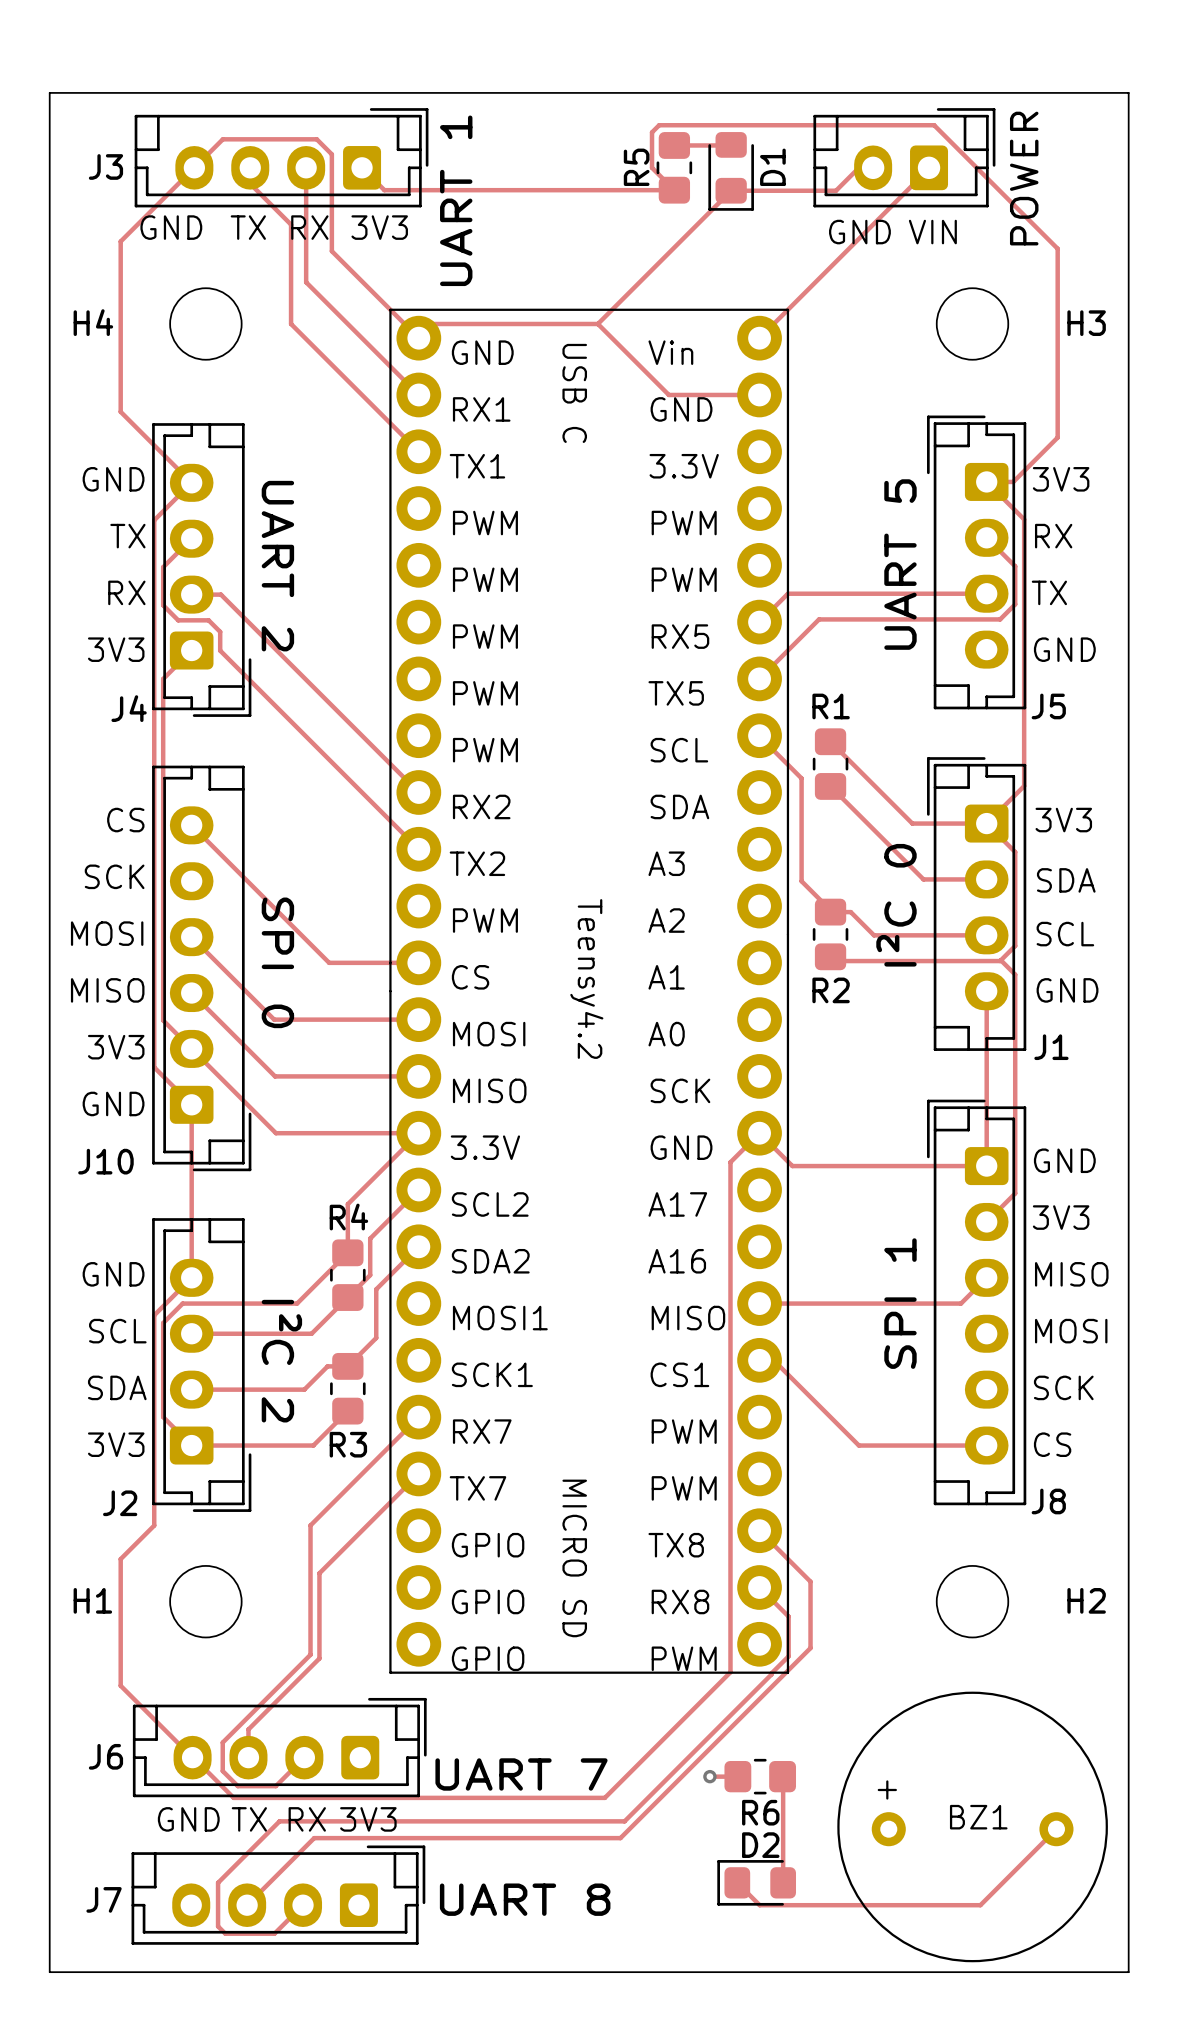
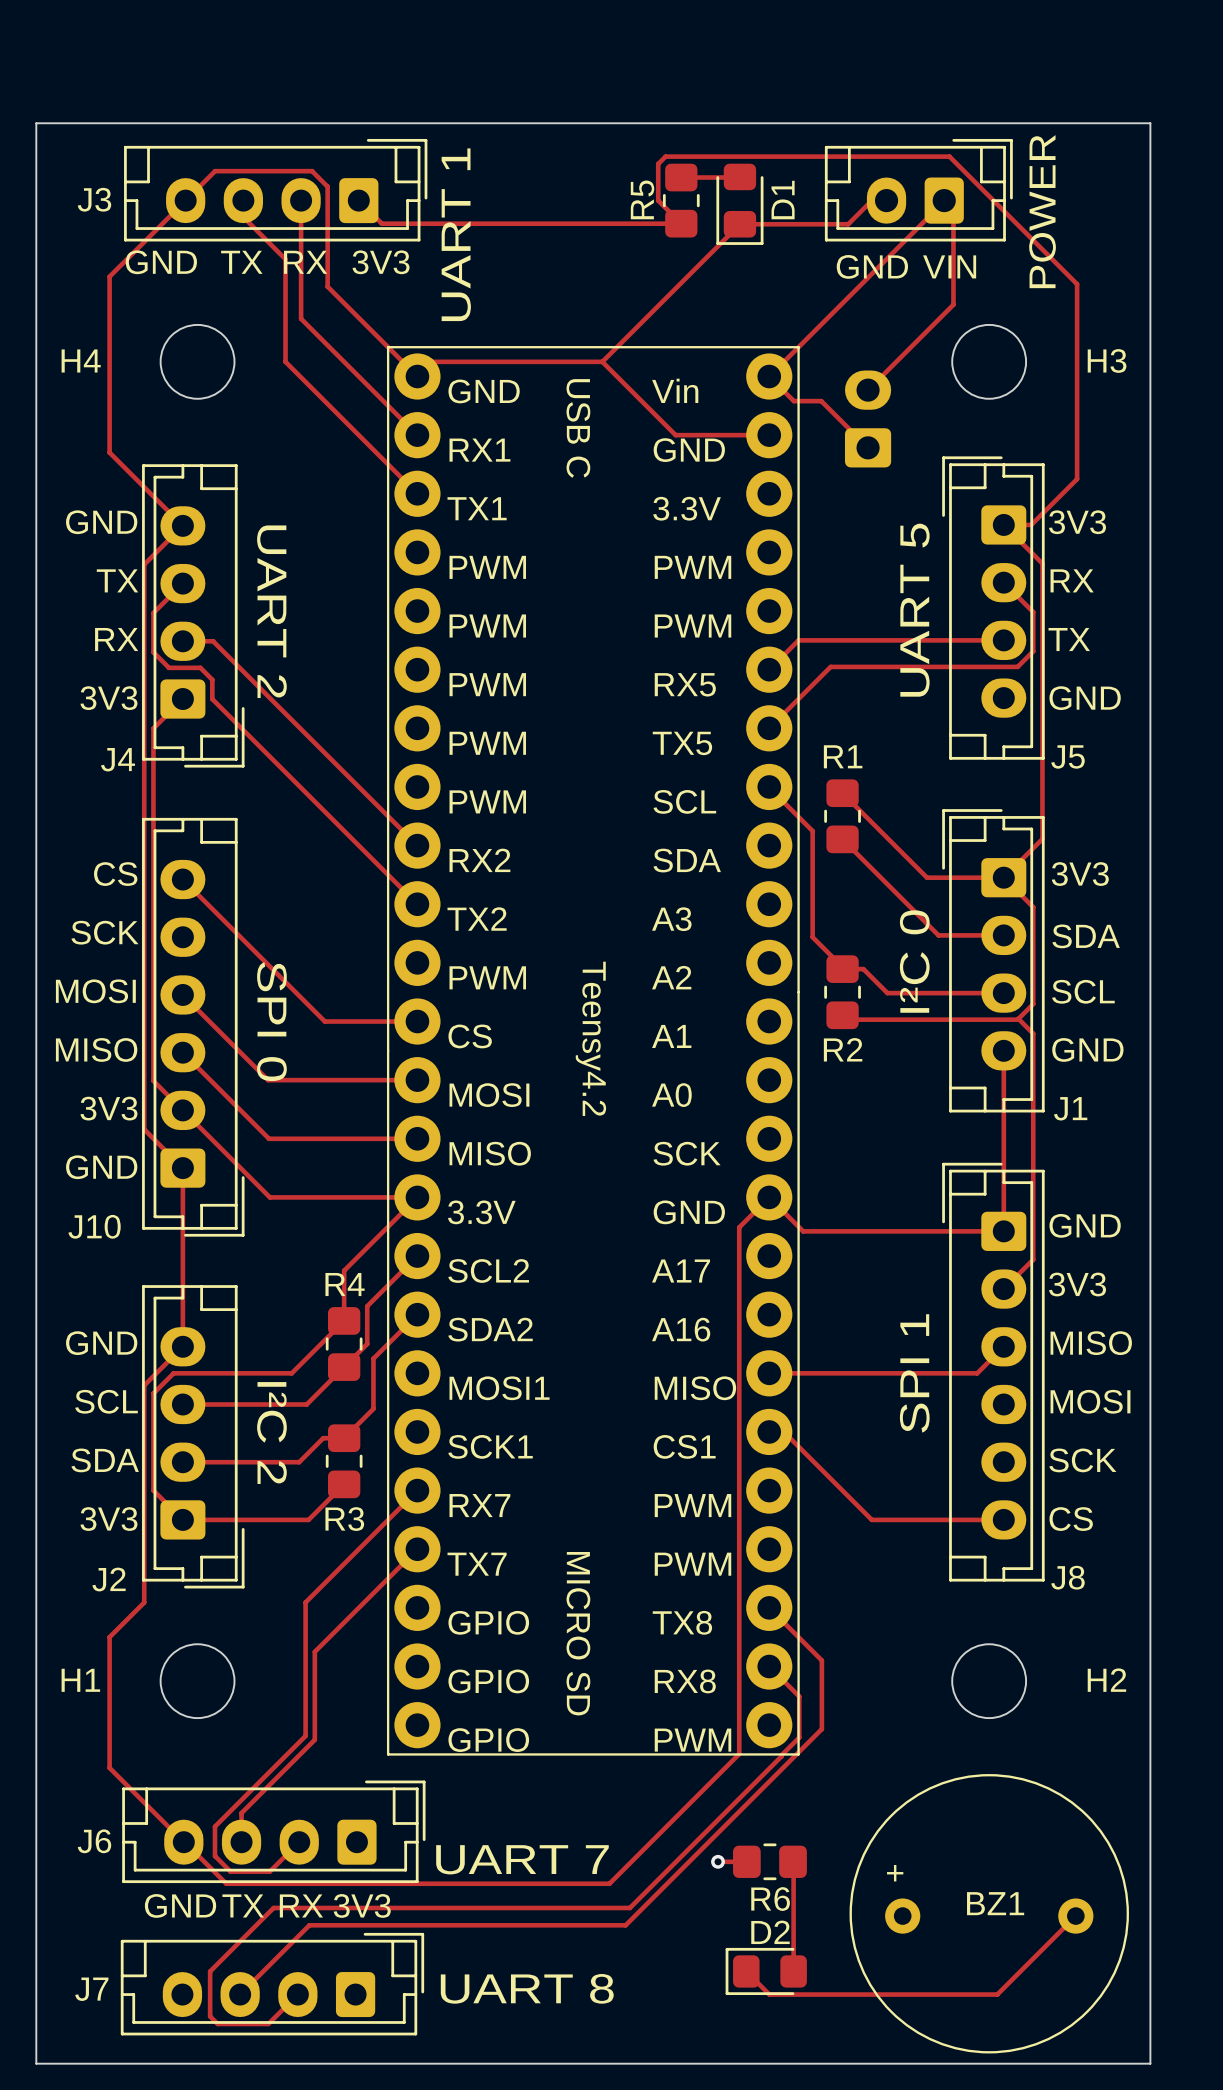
track: none -> (953, 197) (953, 304) (868, 390)
track: none -> (775, 383) (793, 401) (821, 401) (868, 447)
part: none -> (868, 418)

